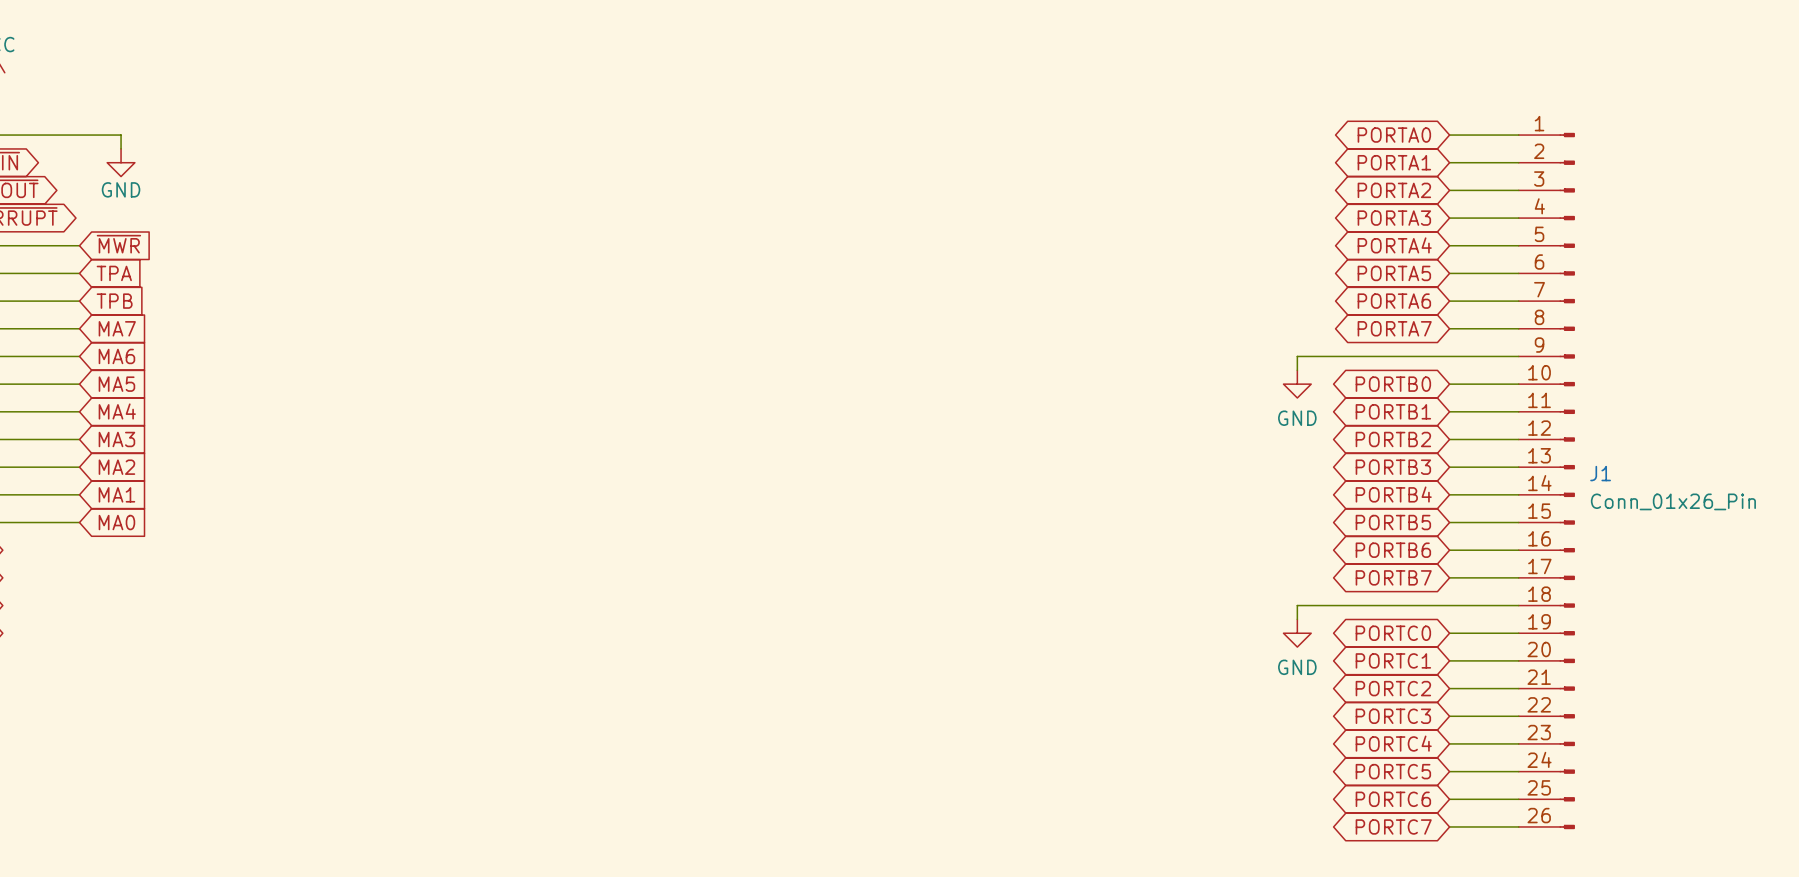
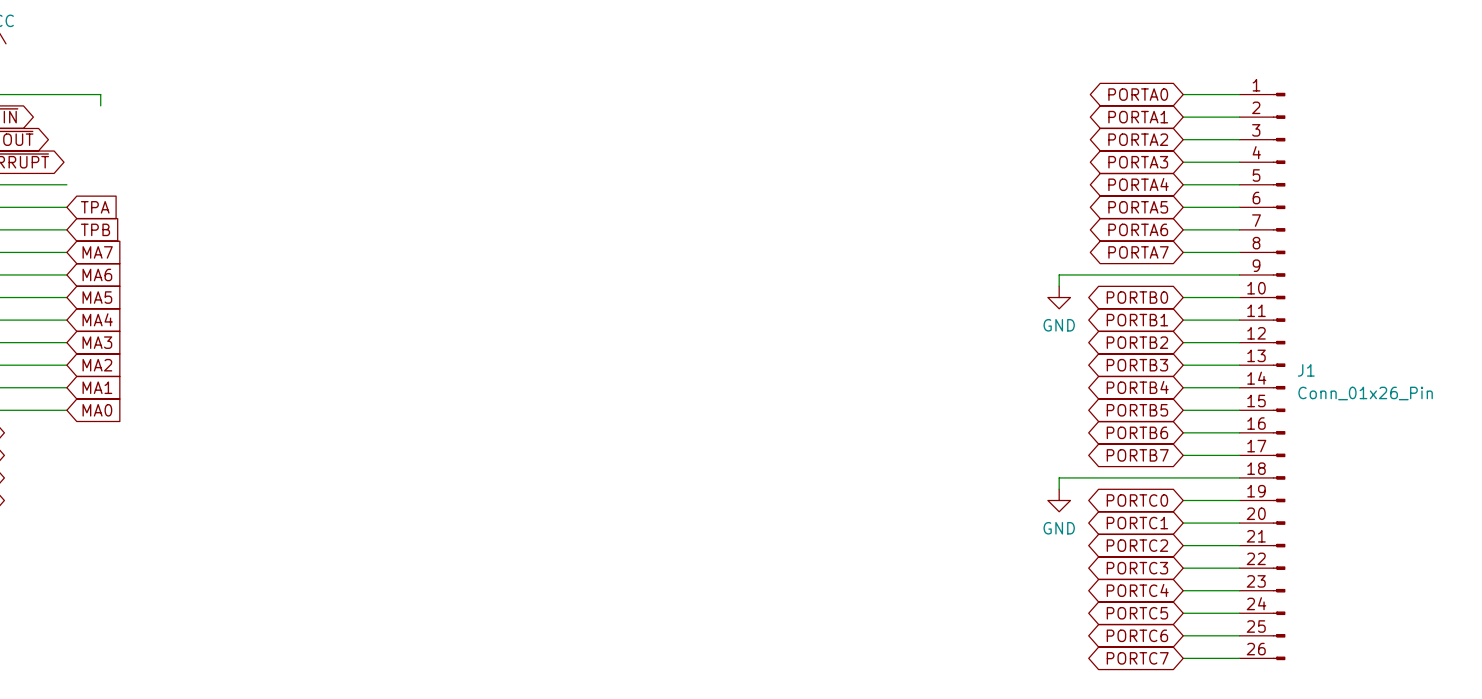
power symbol: GND (121, 162) -> none
global label: ~{MWR} (118, 244) -> none

